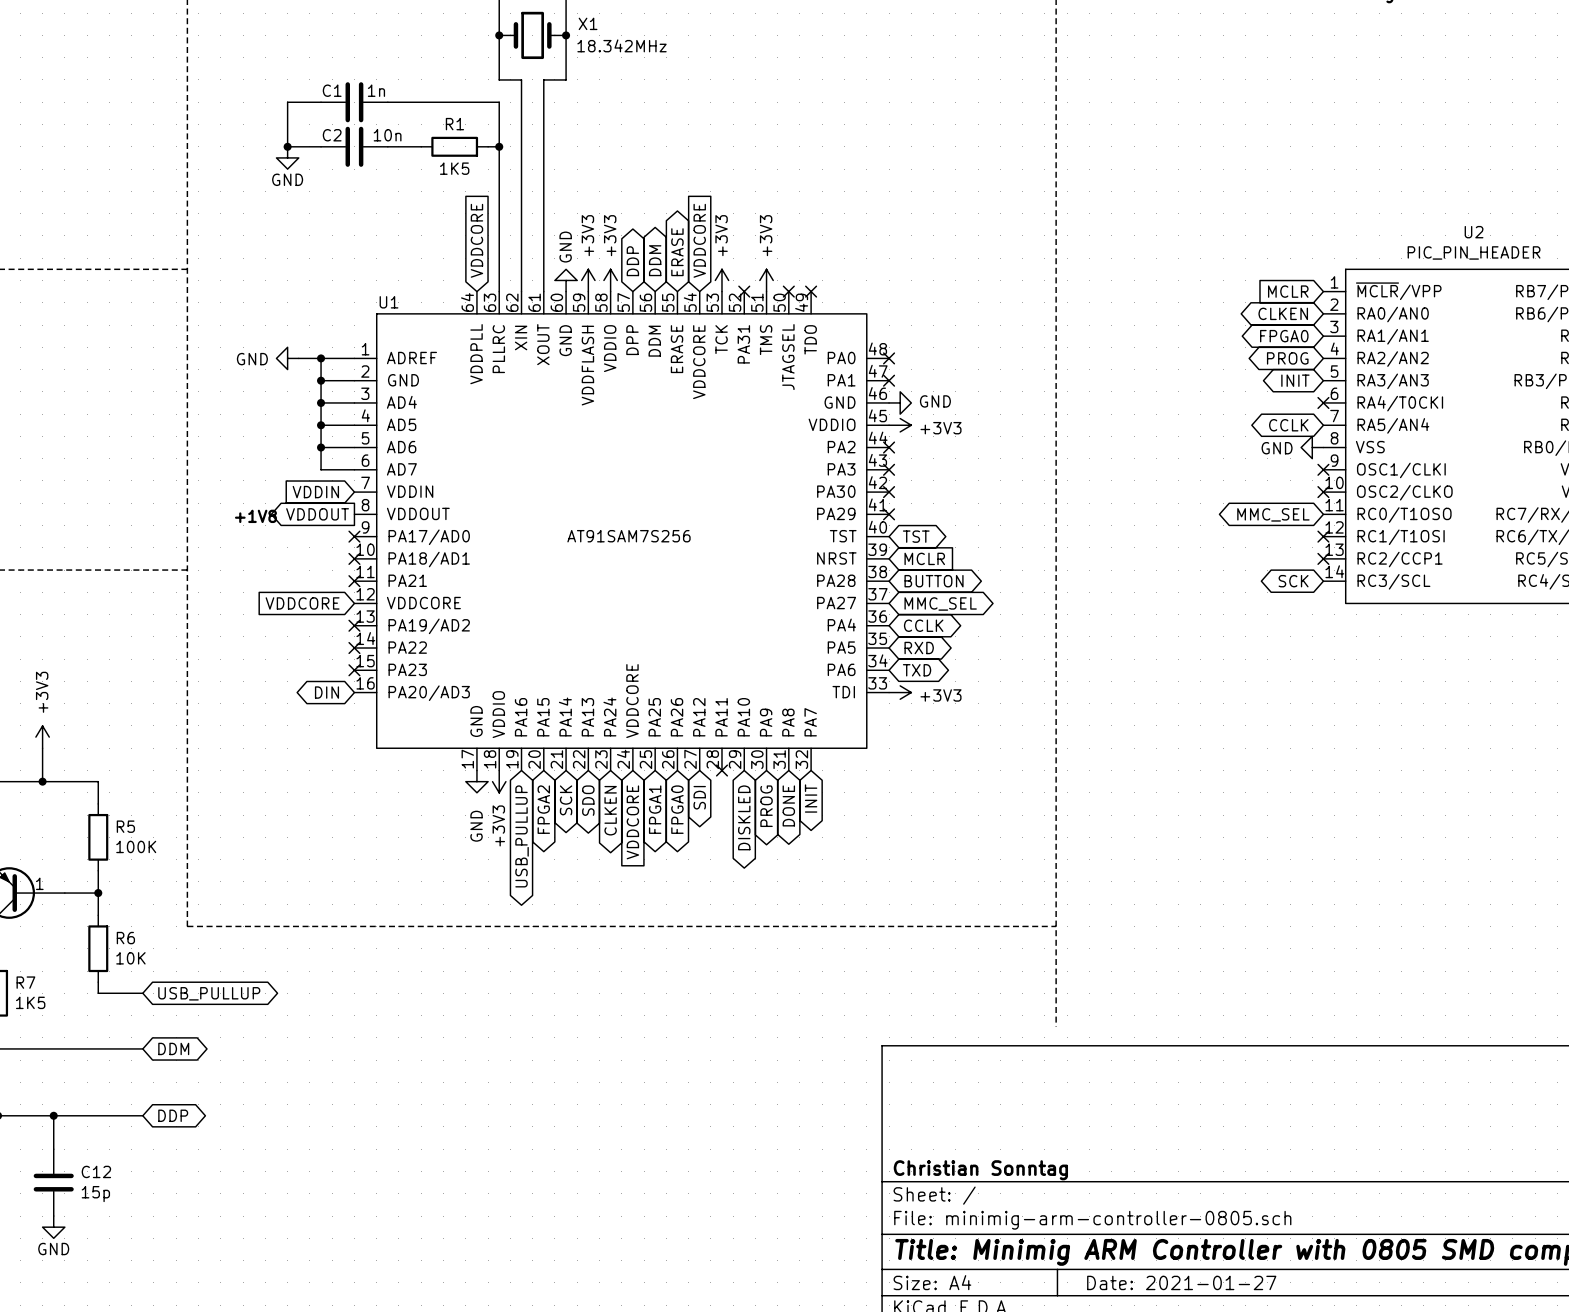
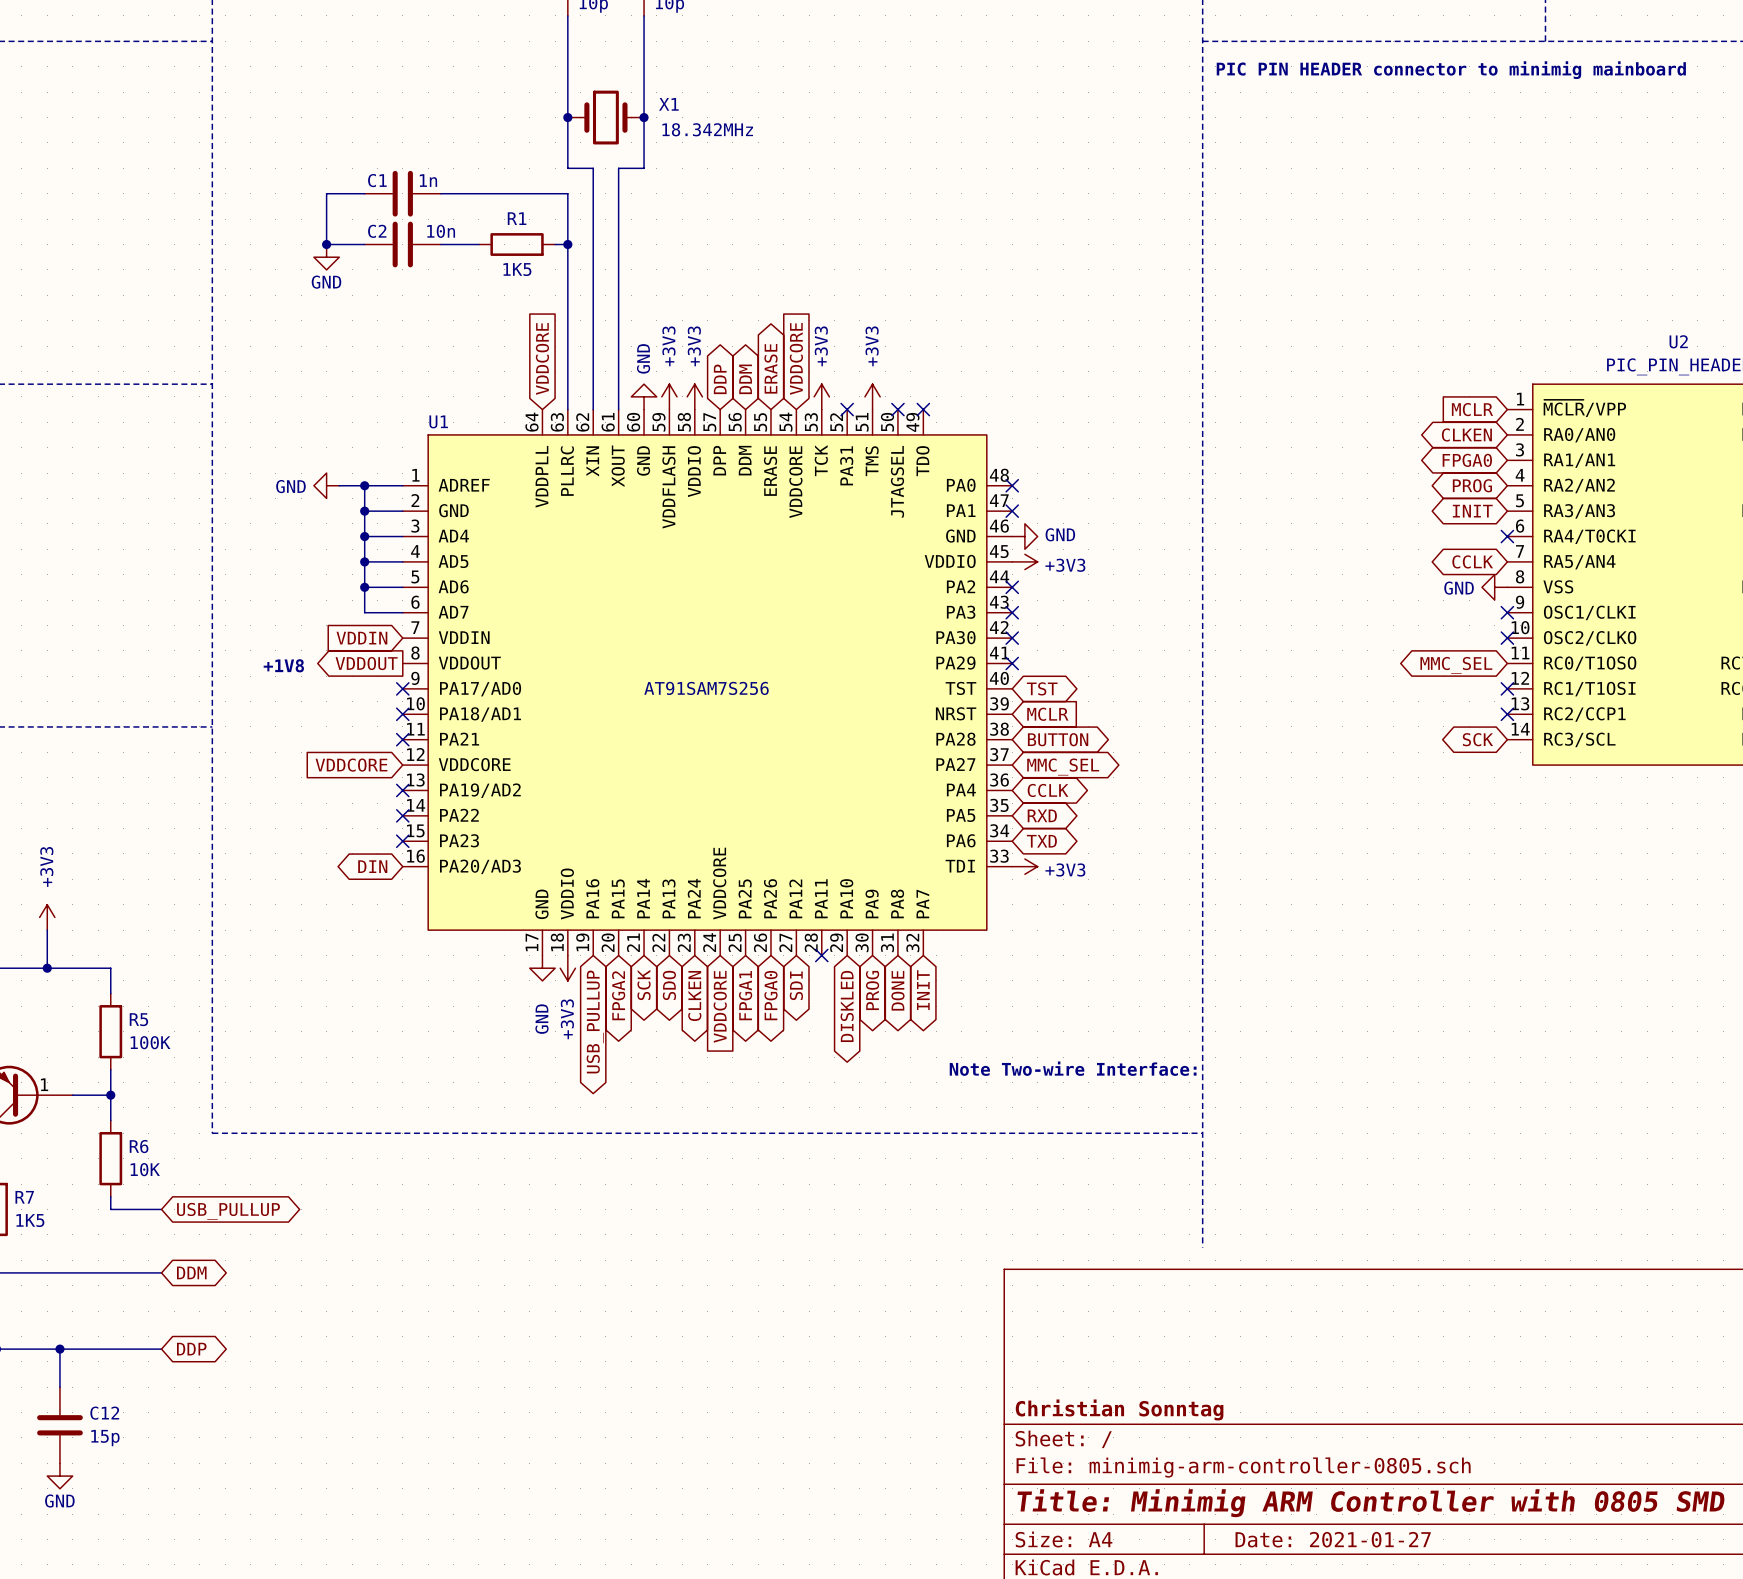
text: none -> Note Two-wire Interface: (1073, 1068)

